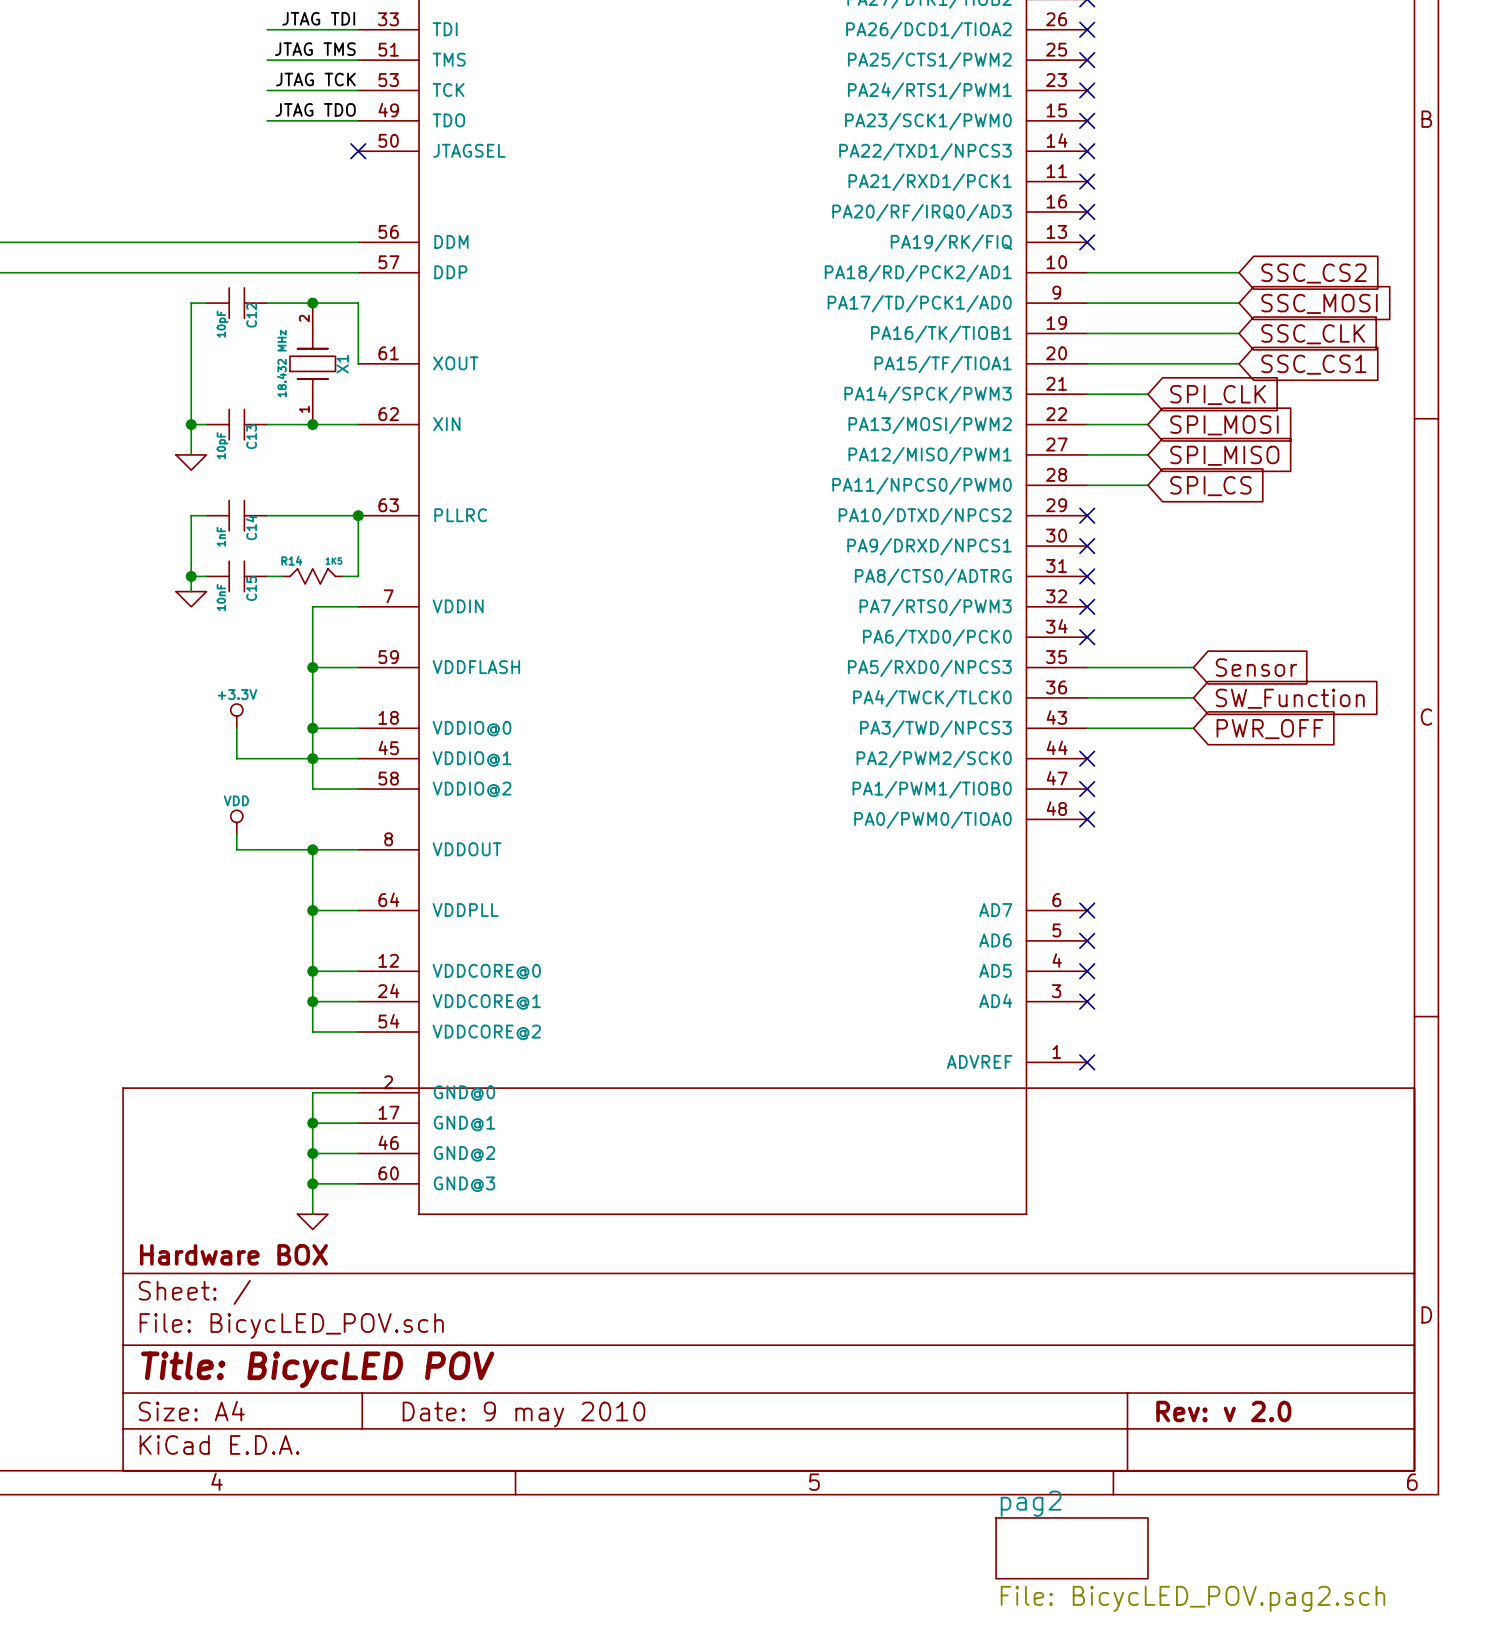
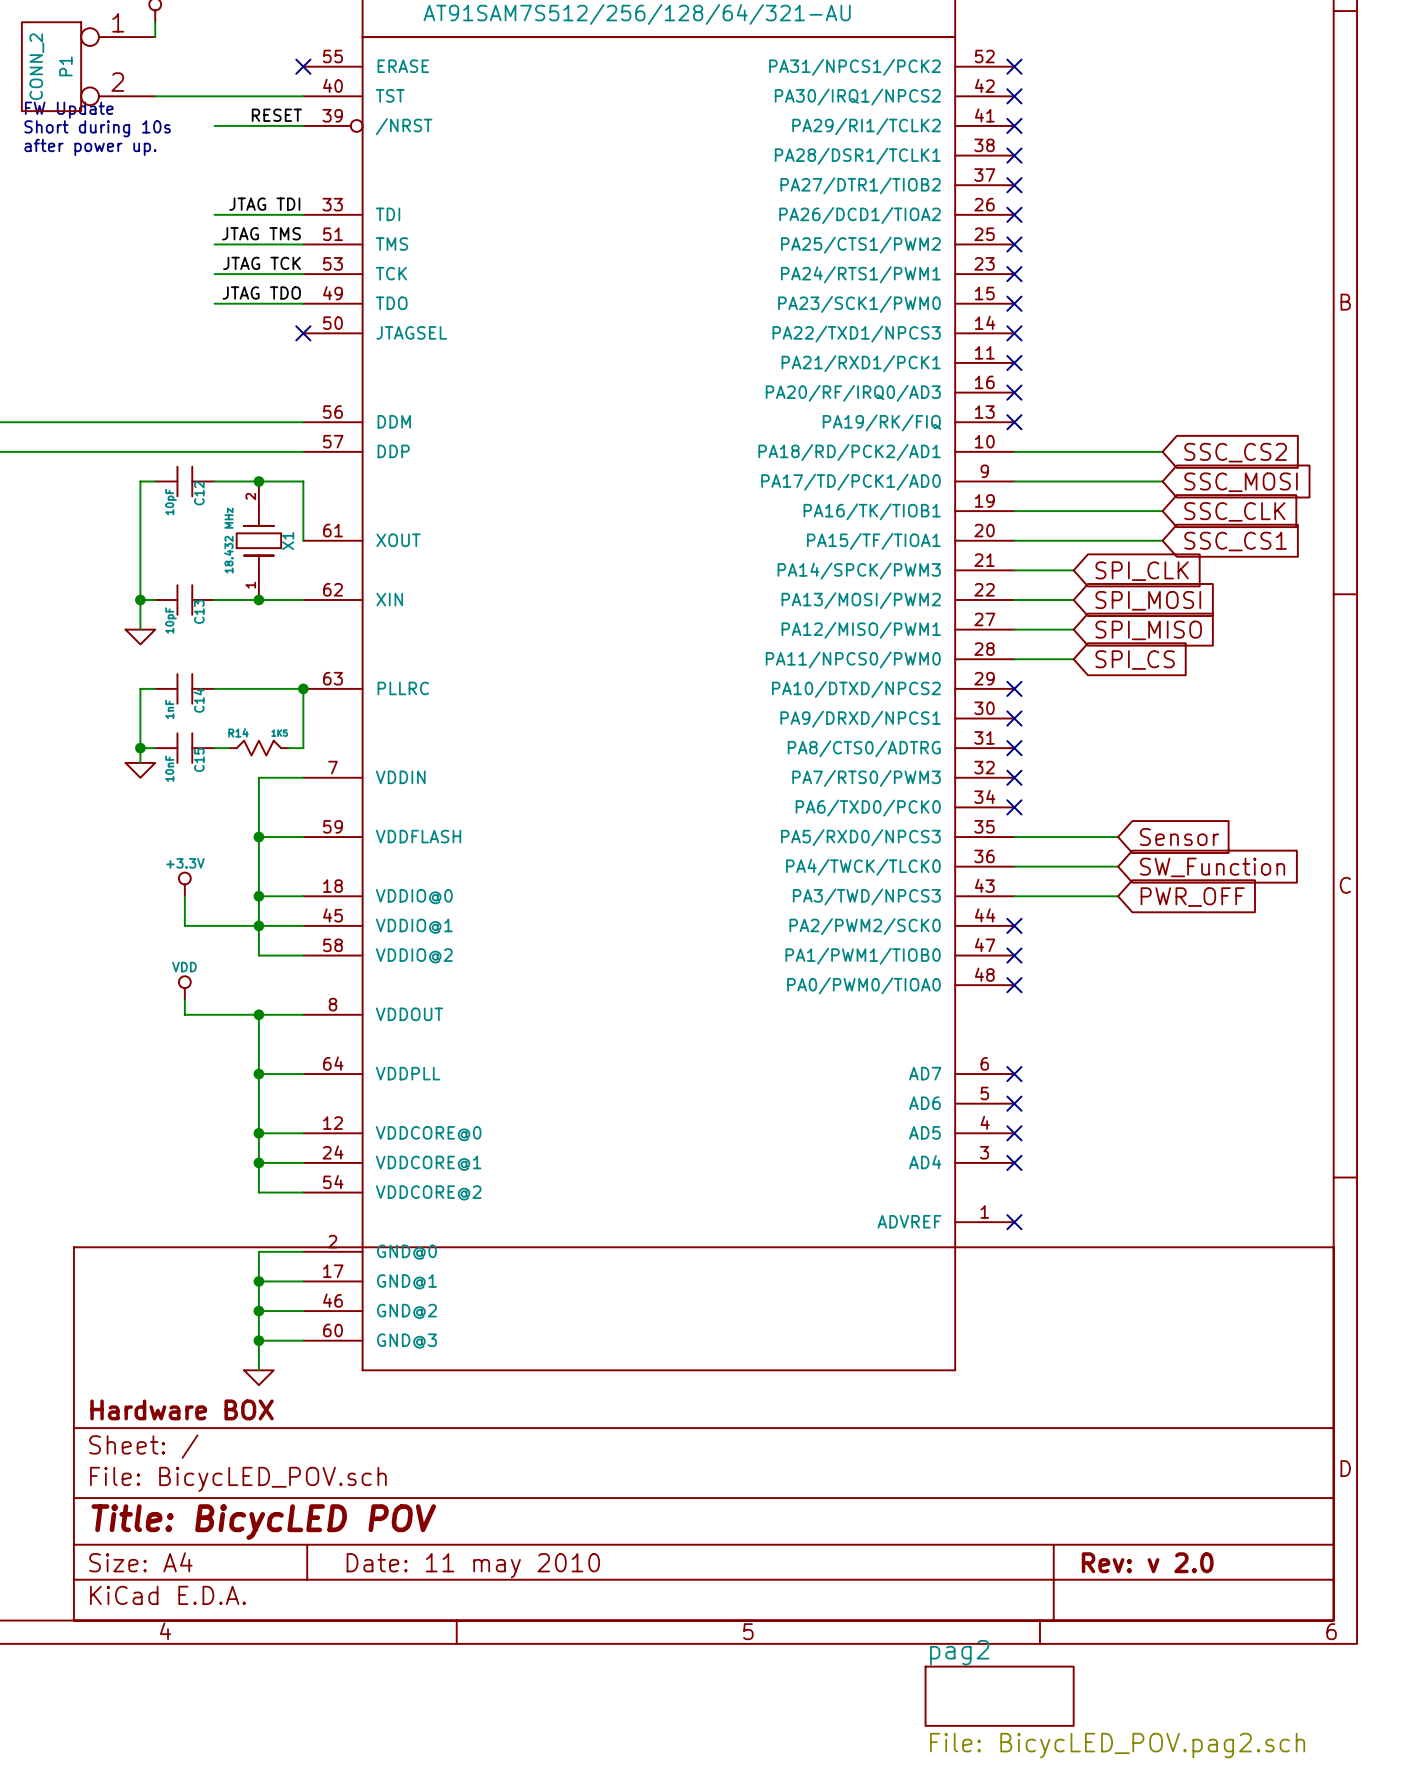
title block: Date: 9 may 2010 (524, 1414) -> Date: 11 may 2010 (473, 1565)

